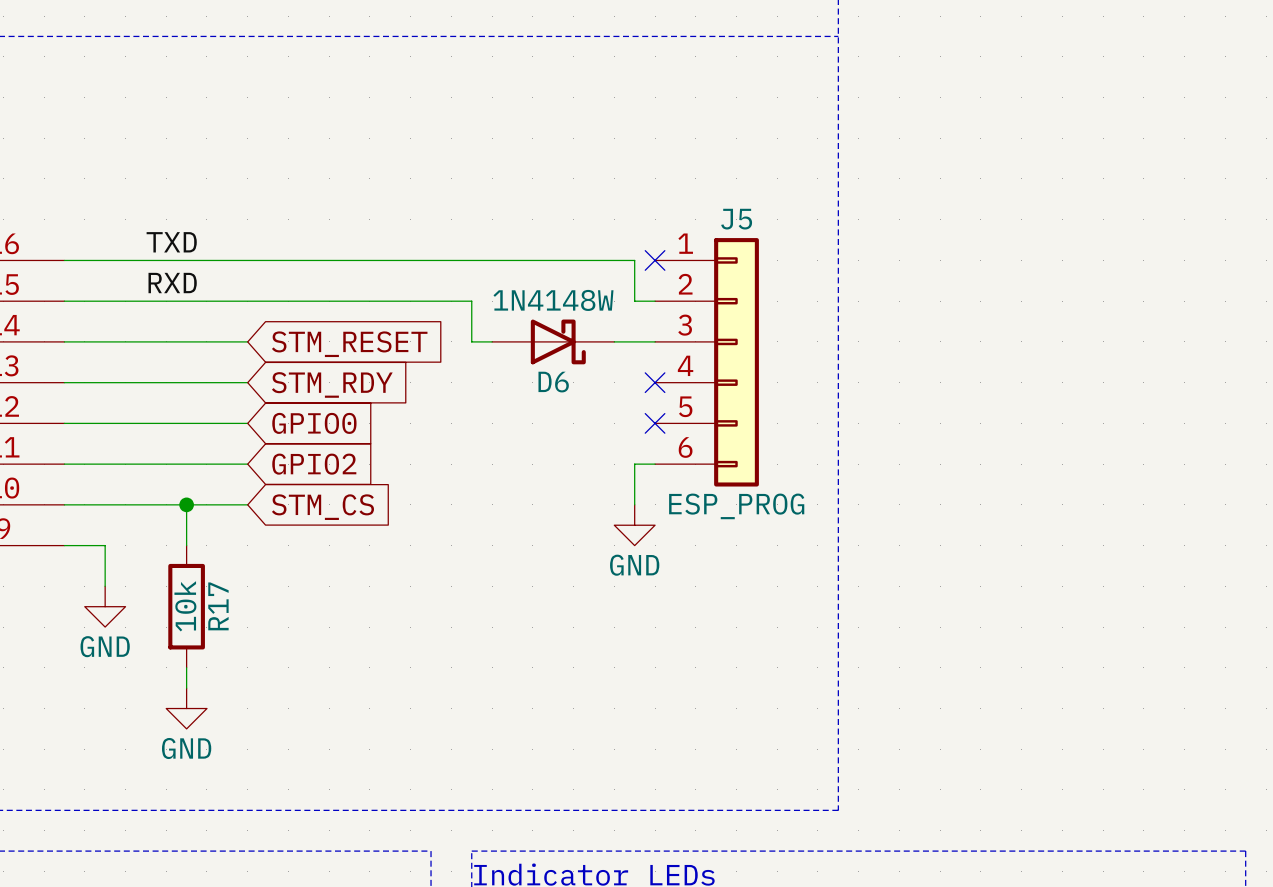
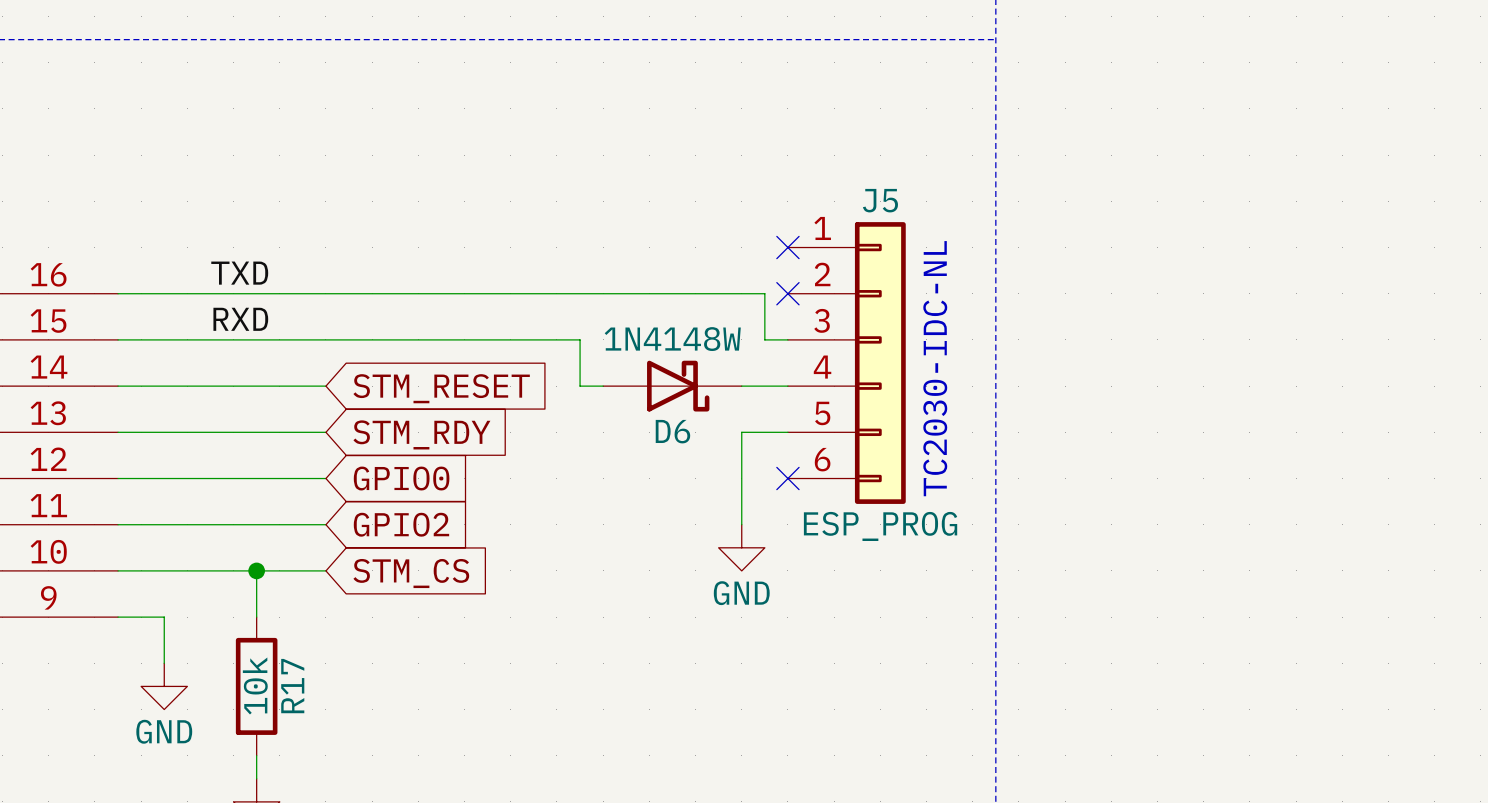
no-connect mark: none -> (787, 247)
text: none -> TC2030-IDC-NL (935, 368)
J5 position: (706, 362) -> (846, 363)
wire: none -> (787, 432) (741, 432) (741, 524)
no-connect mark: (655, 382) -> none
wire: (655, 464) (634, 464) (634, 504) -> none
power symbol position: GND (634, 525) -> GND (741, 547)

